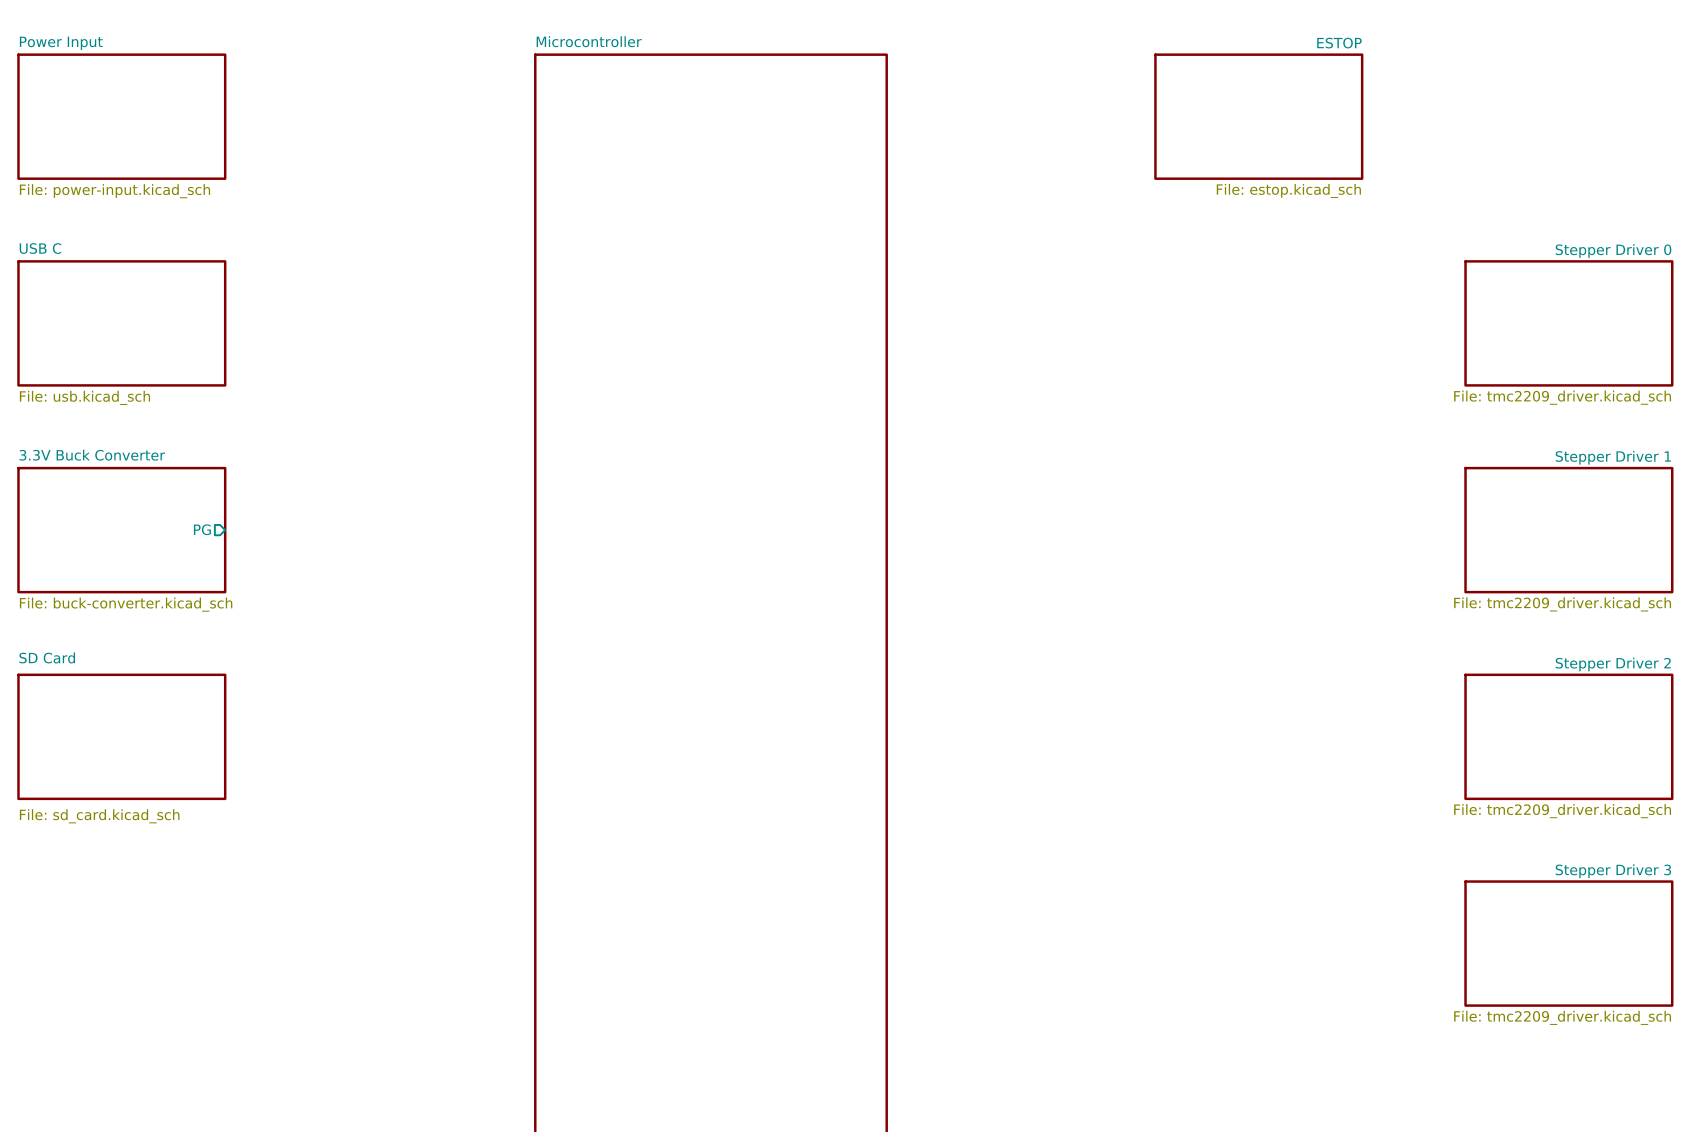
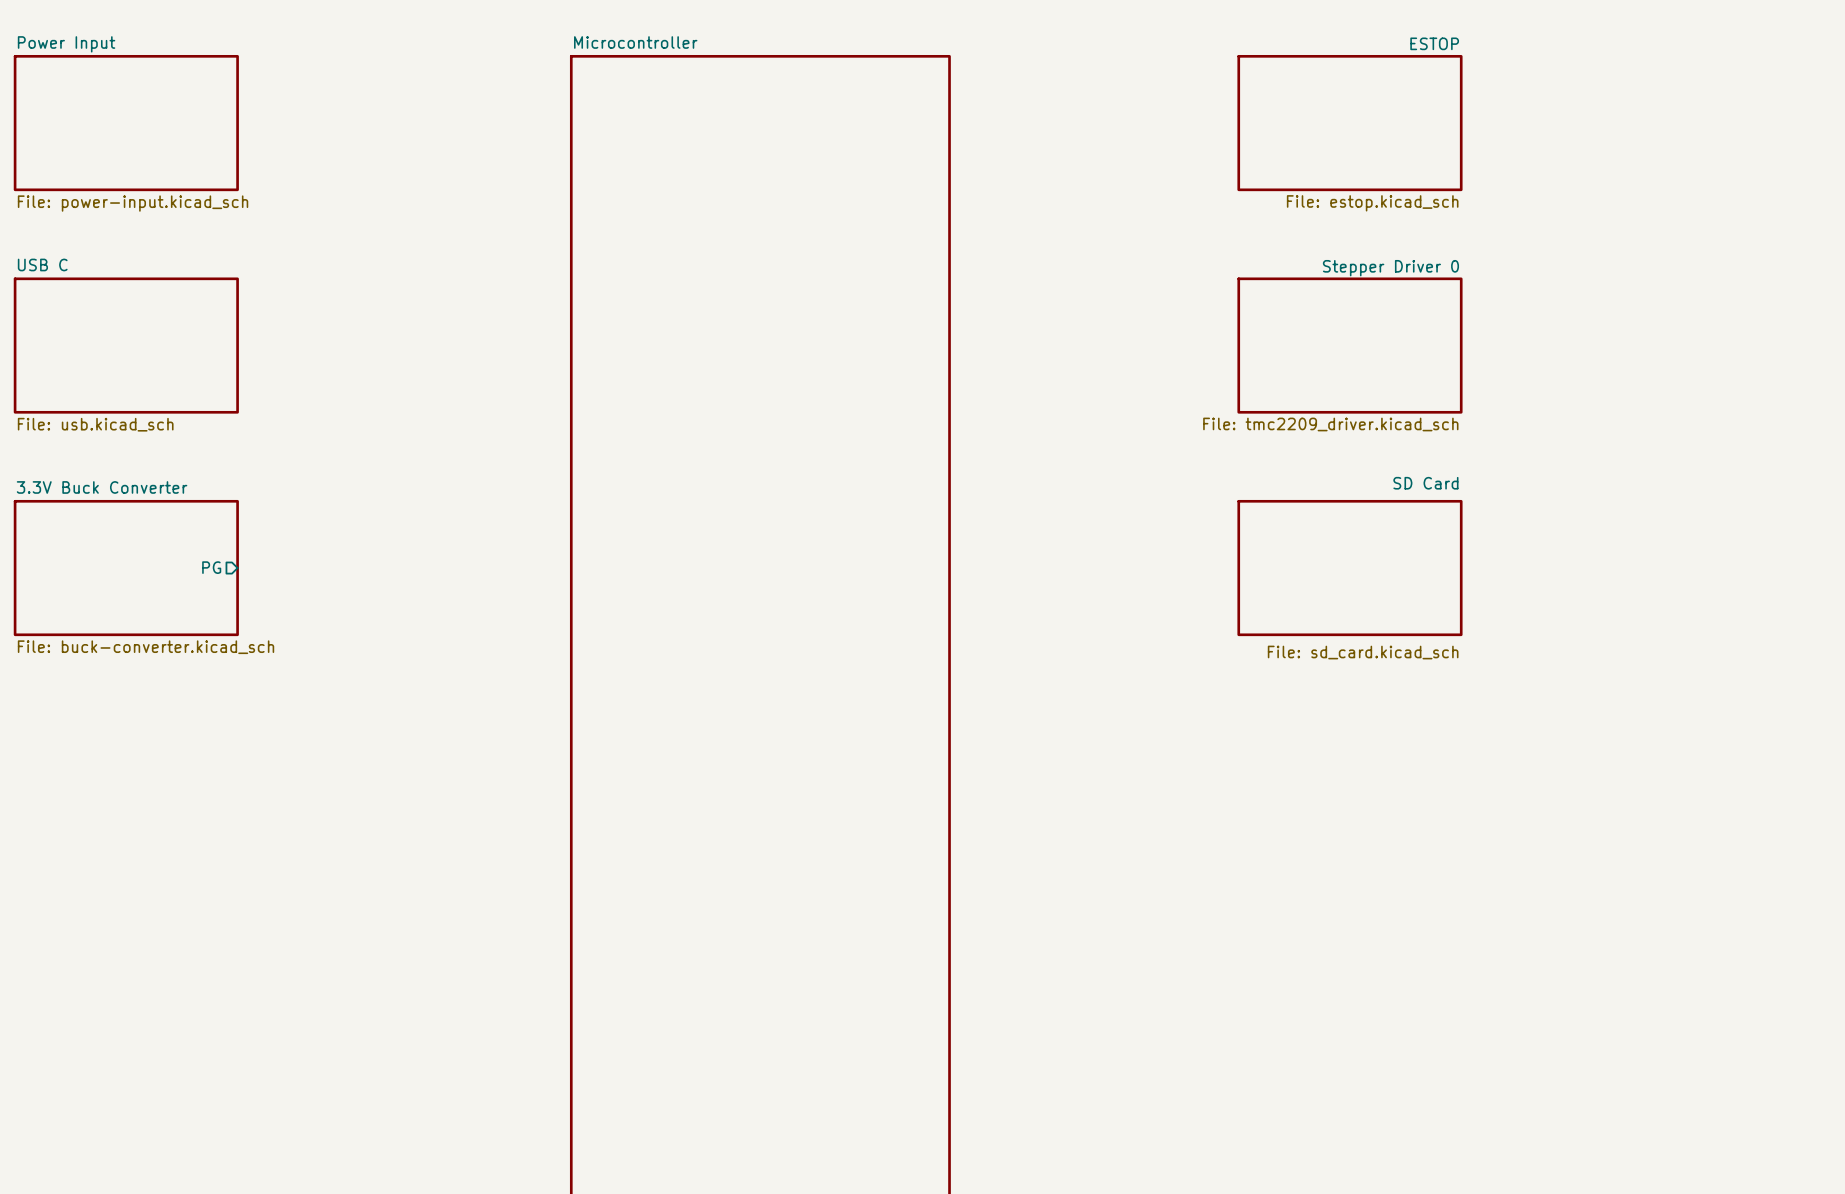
sheet Stepper Driver 0 position: (1568, 323) -> (1349, 345)
sheet SD Card: none -> File: sd_card.kicad_sch (1349, 568)
sheet Stepper Driver 1: File: tmc2209_driver.kicad_sch (1568, 530) -> none
sheet SD Card: File: sd_card.kicad_sch (121, 736) -> none
sheet Stepper Driver 2: File: tmc2209_driver.kicad_sch (1568, 736) -> none
sheet Stepper Driver 3: File: tmc2209_driver.kicad_sch (1568, 943) -> none

